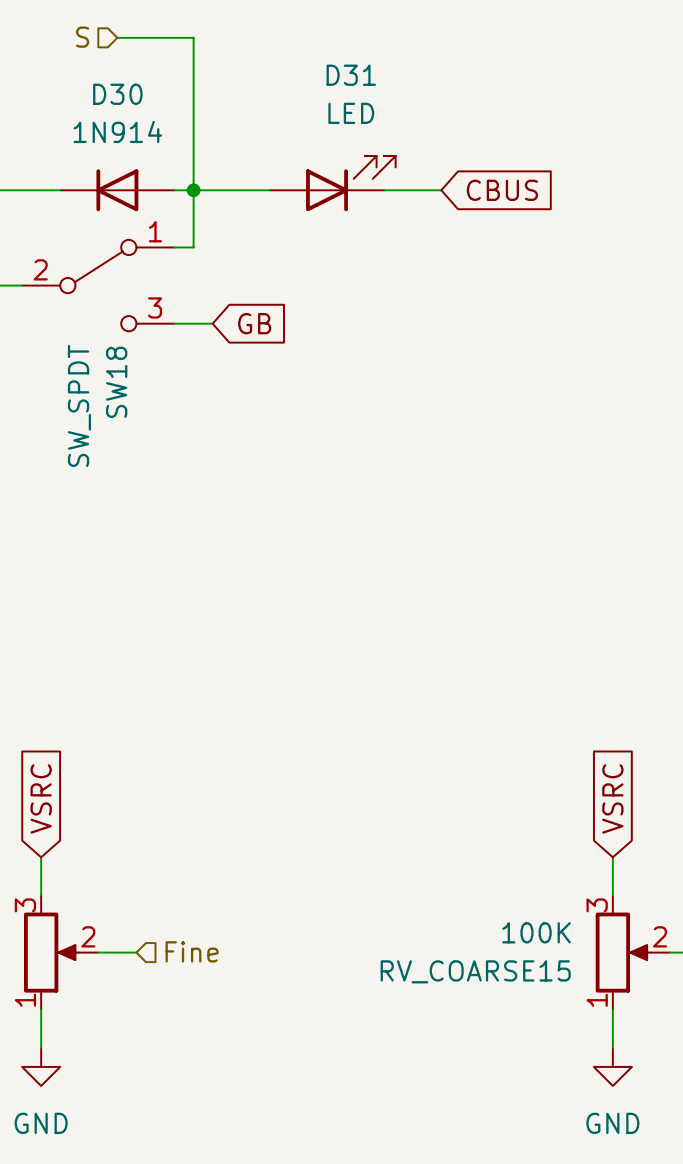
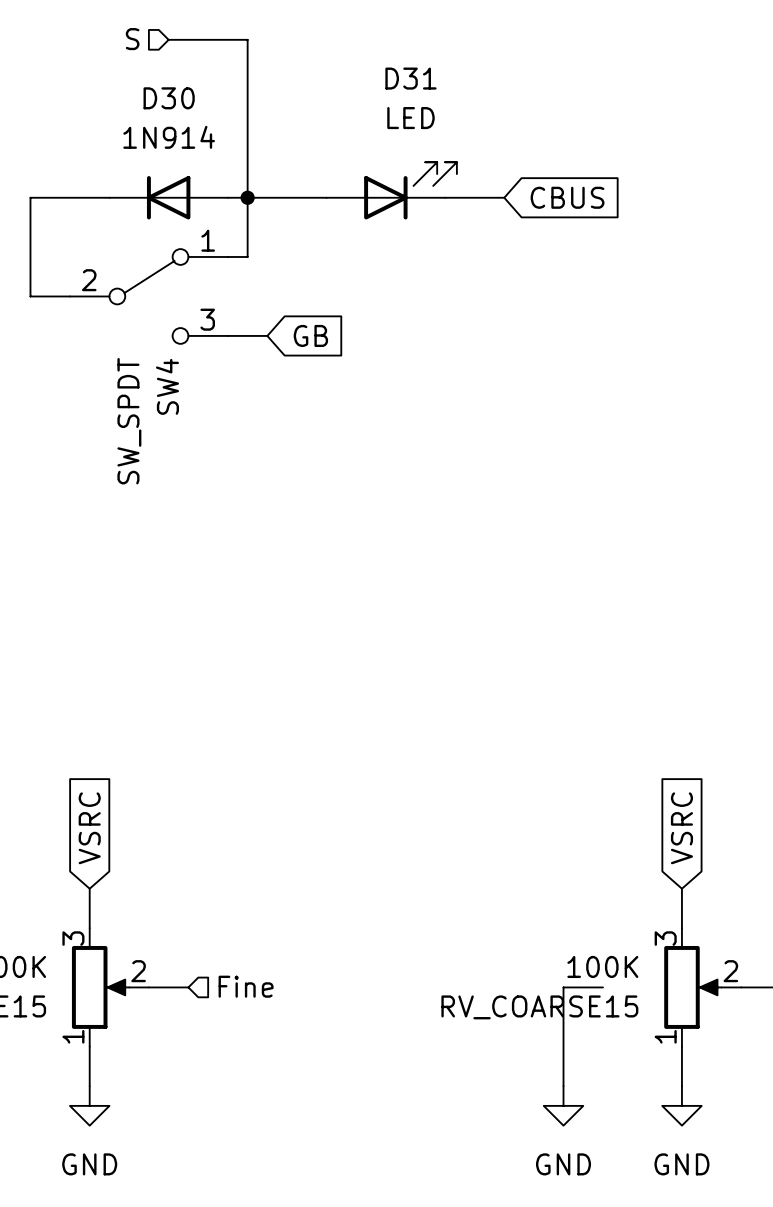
SW18 name: SW18 (116, 382) -> SW4 (167, 386)
wire: none -> (602, 987) (563, 987) (563, 1086)
power symbol: none -> GND (563, 1105)

